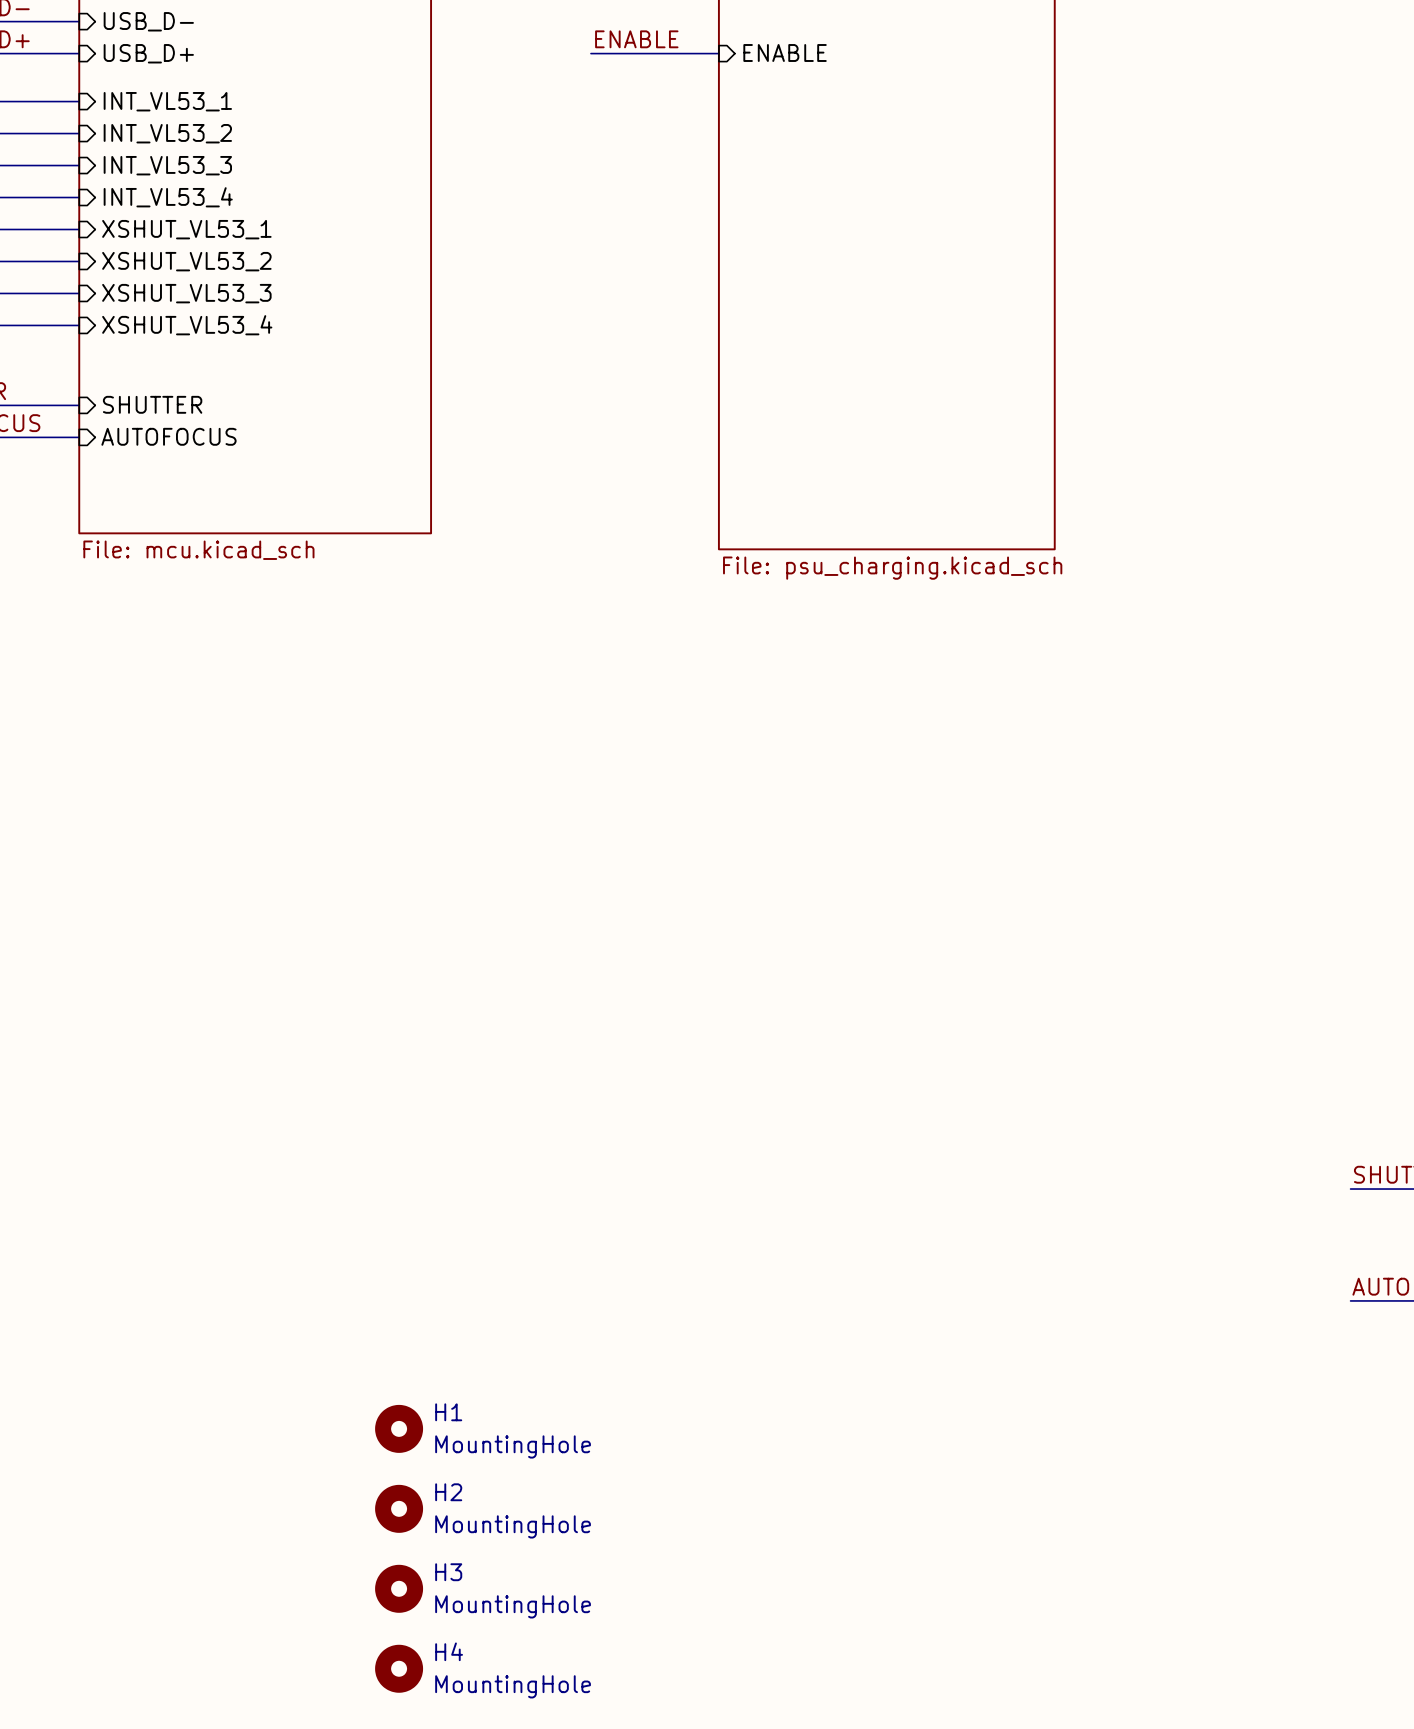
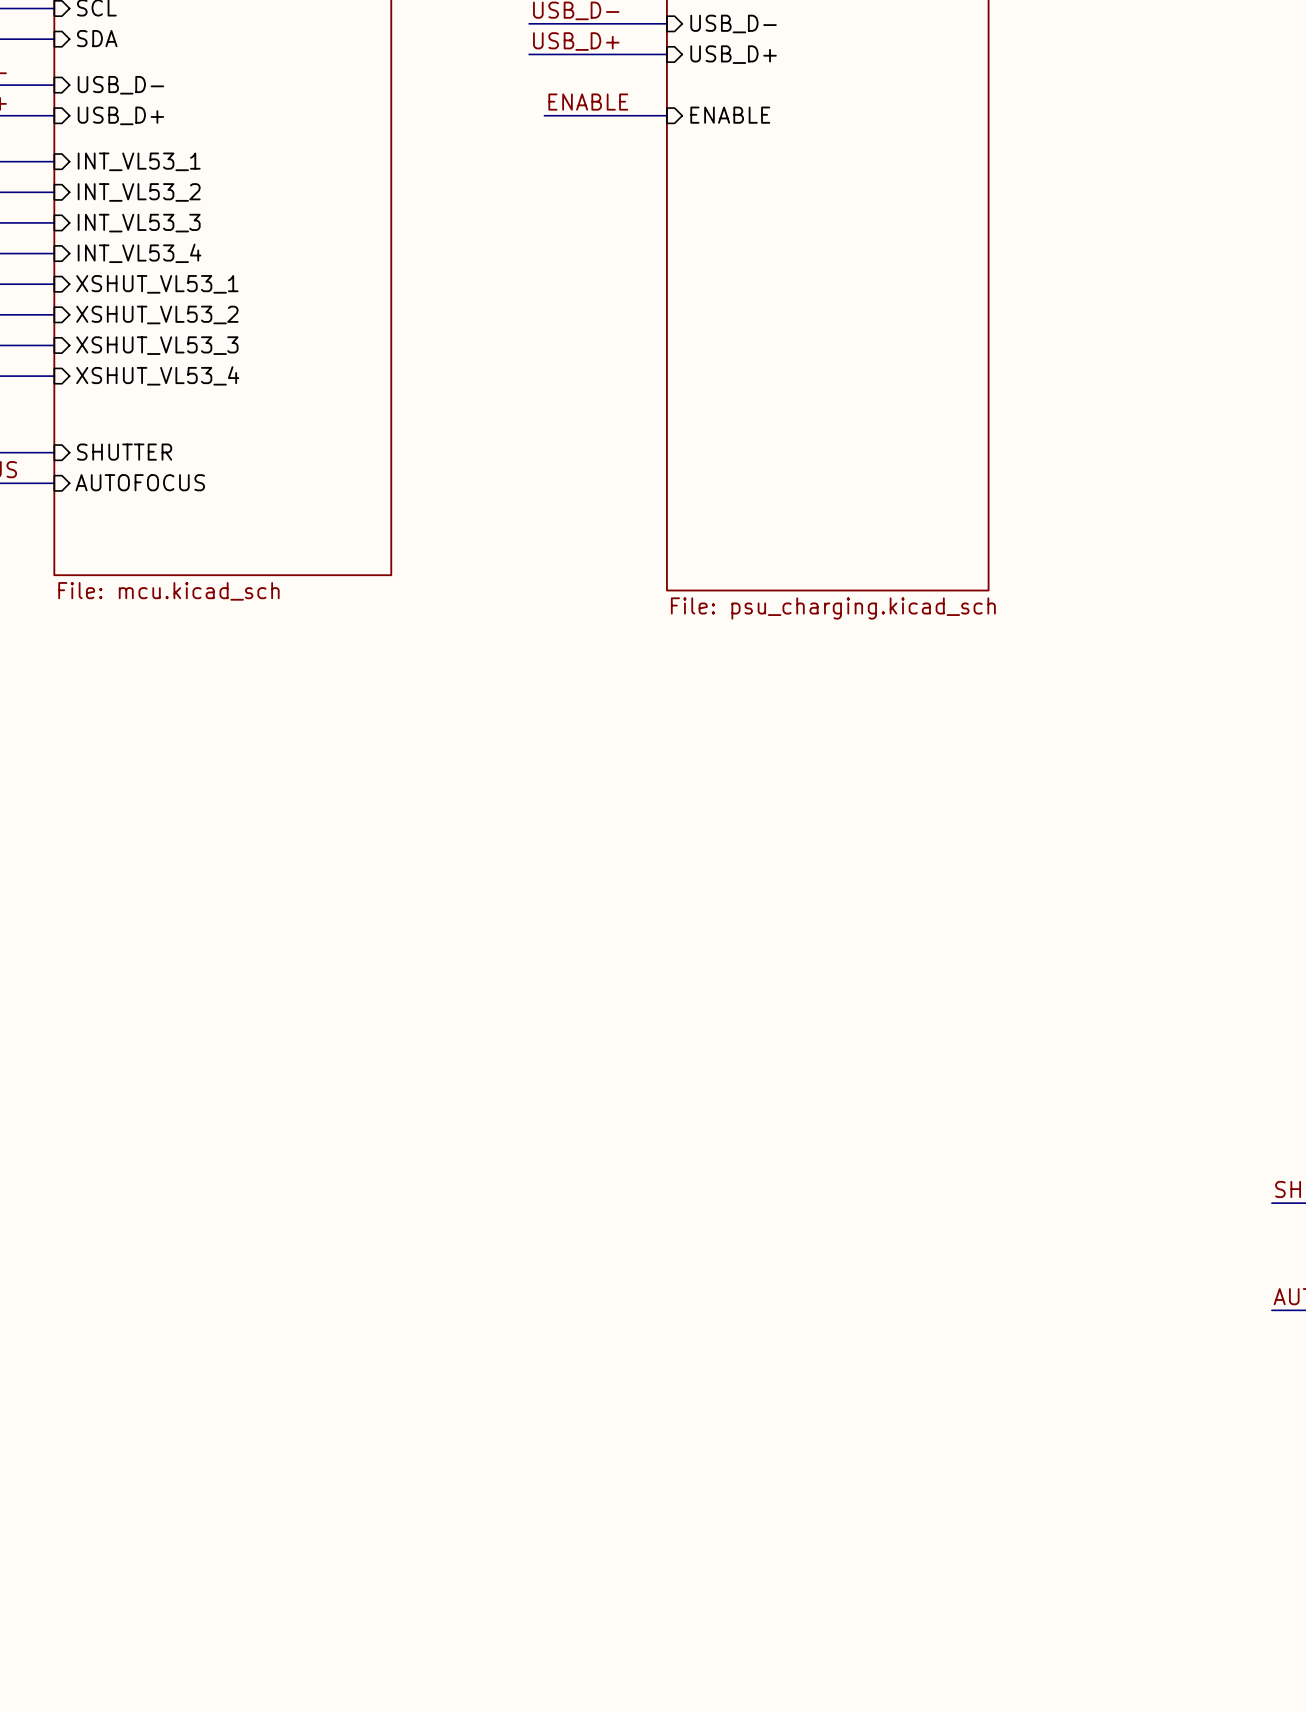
H1: MountingHole (399, 1428) -> none
H2: MountingHole (399, 1508) -> none
H3: MountingHole (399, 1588) -> none
H4: MountingHole (399, 1668) -> none

